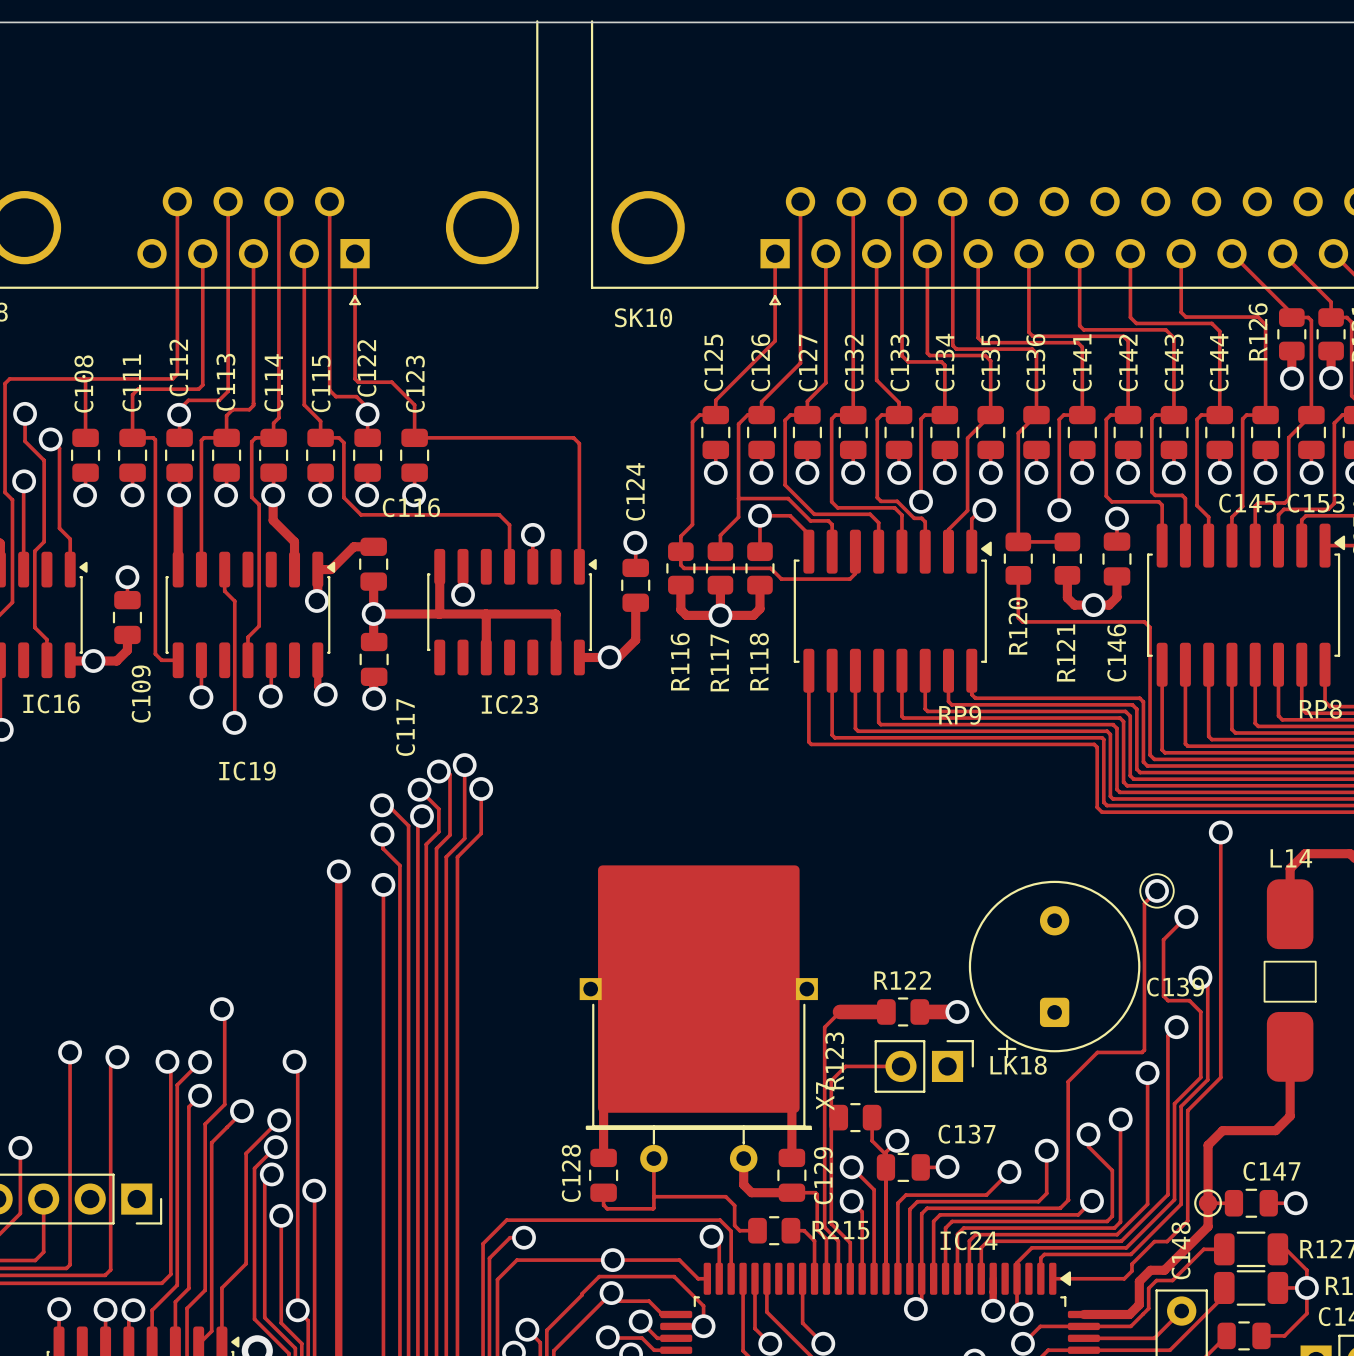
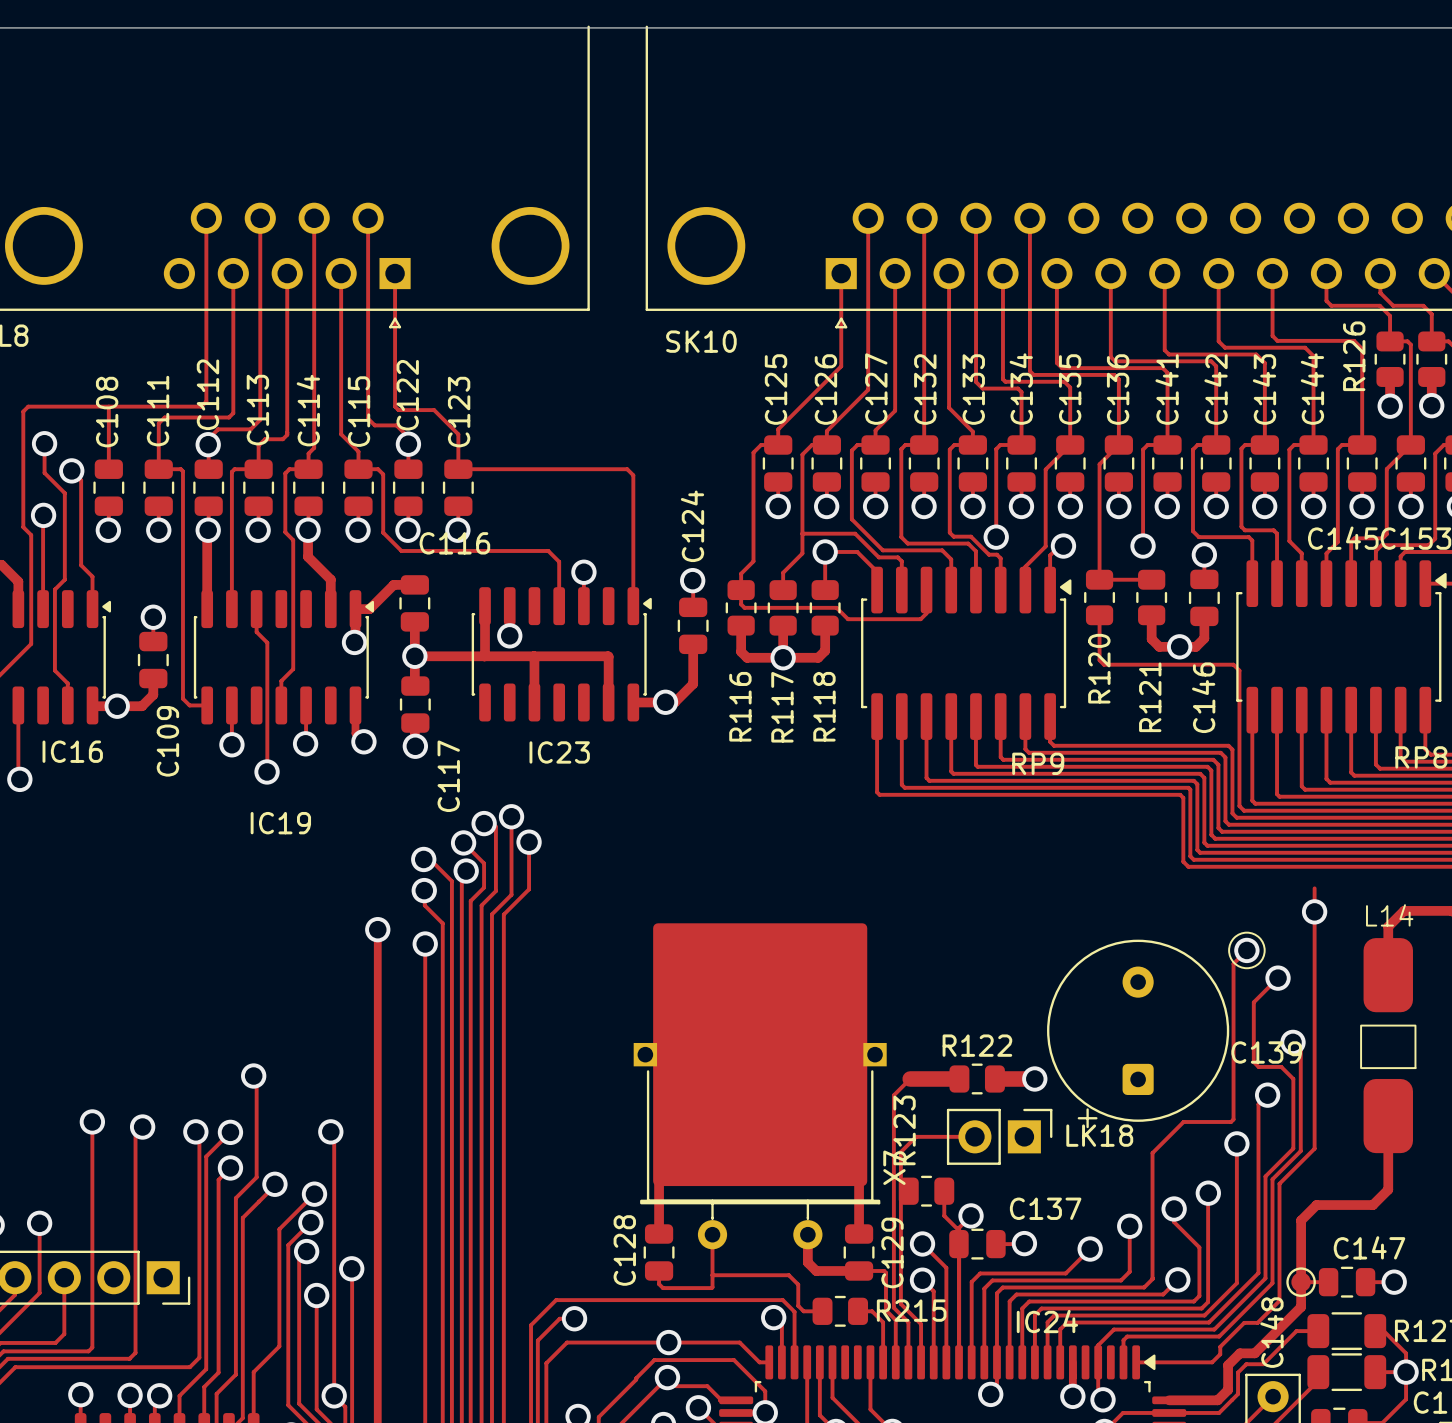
track: (1231, 253) (1291, 313) -> (1326, 273) (1326, 300) (1331, 305) (1379, 305) (1390, 315) (1390, 337)
track: (1282, 253) (1331, 302) -> (1380, 273) (1380, 292) (1393, 305) (1423, 305) (1431, 314) (1431, 324)
via position: (1220, 832) -> (1314, 911)

